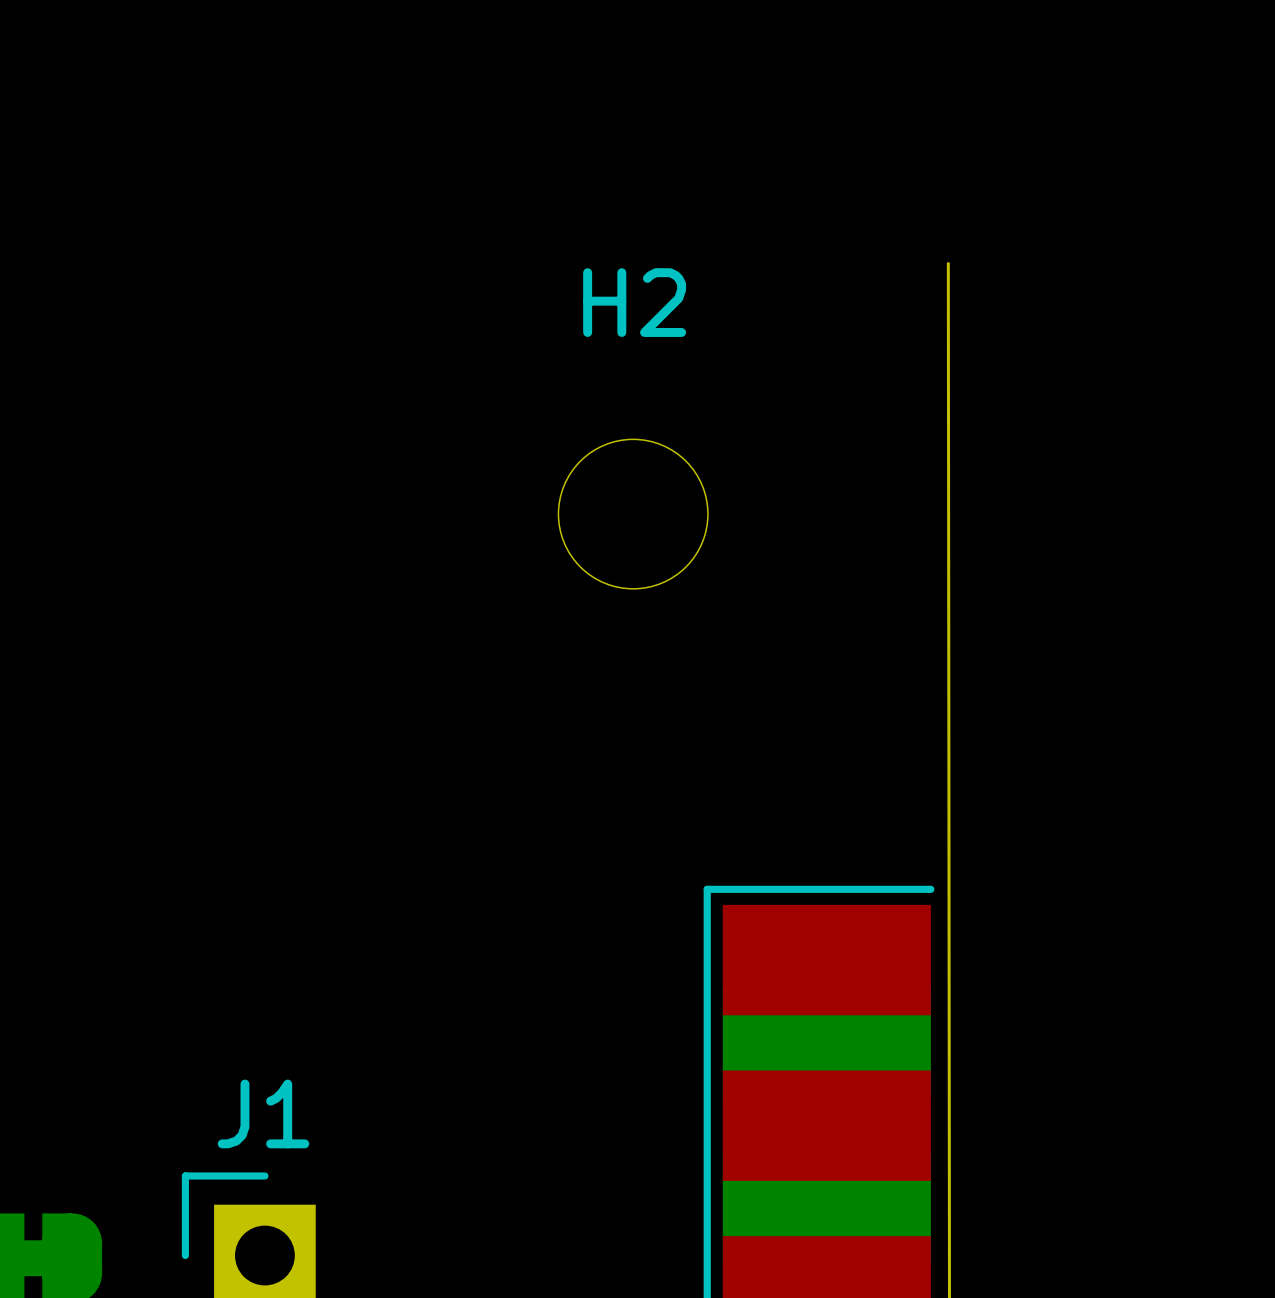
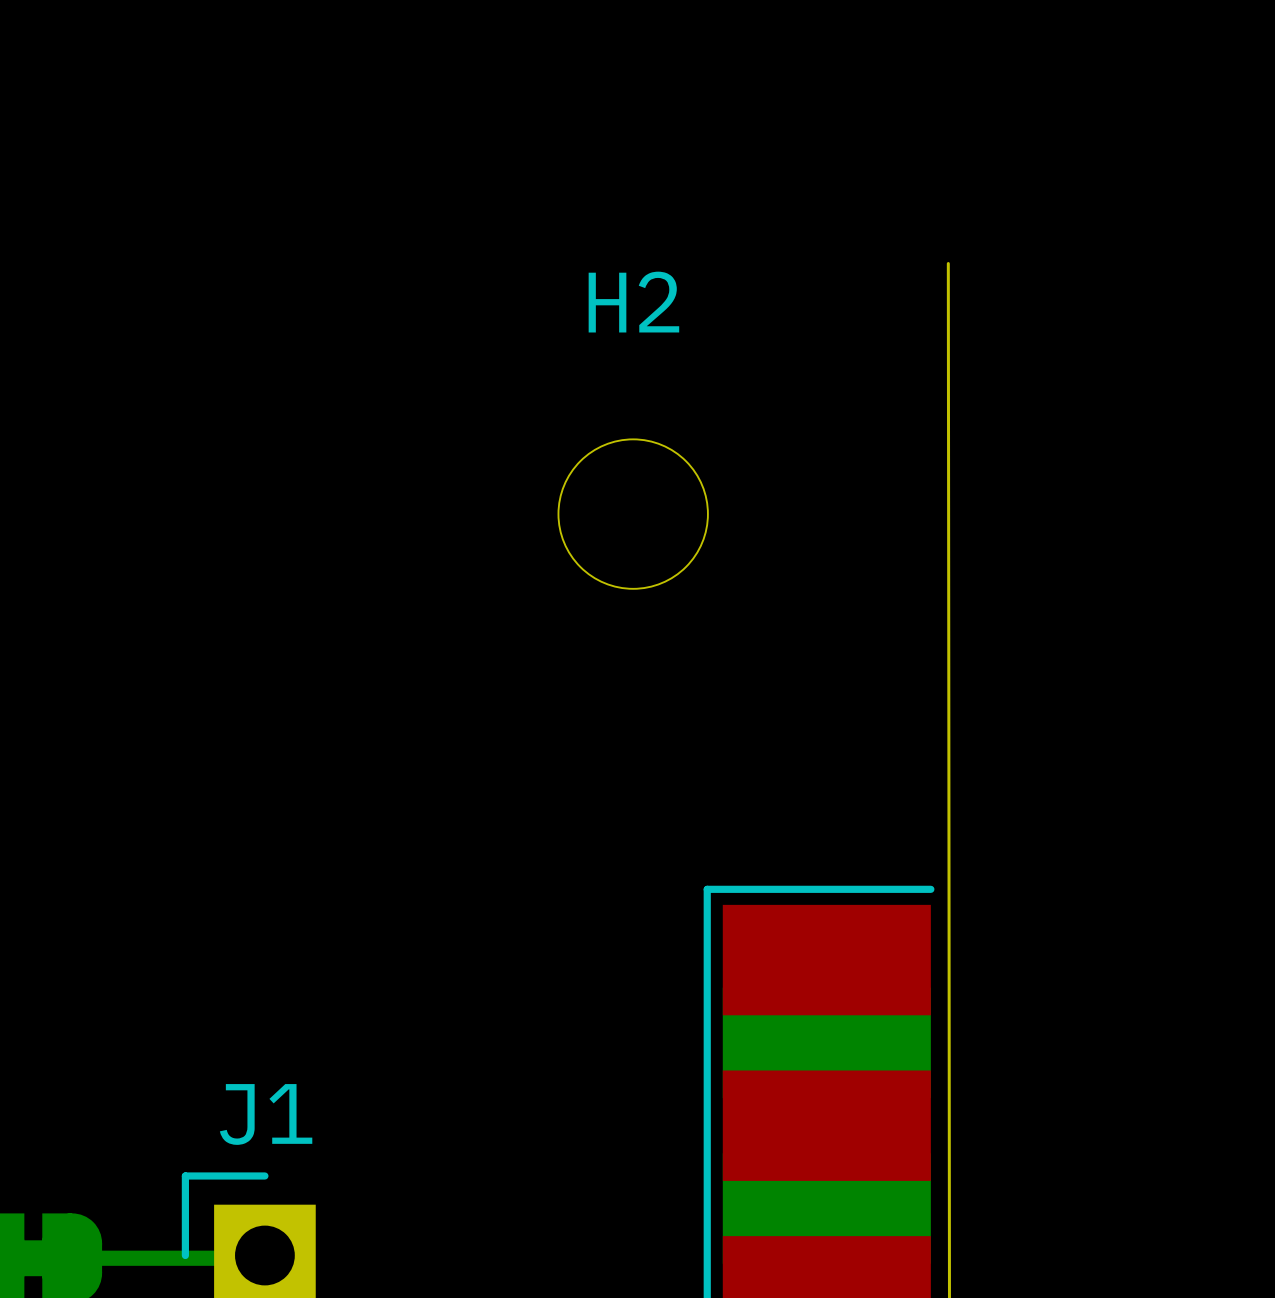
bottom track: none -> (264, 1255) (262, 1258) (72, 1258)

